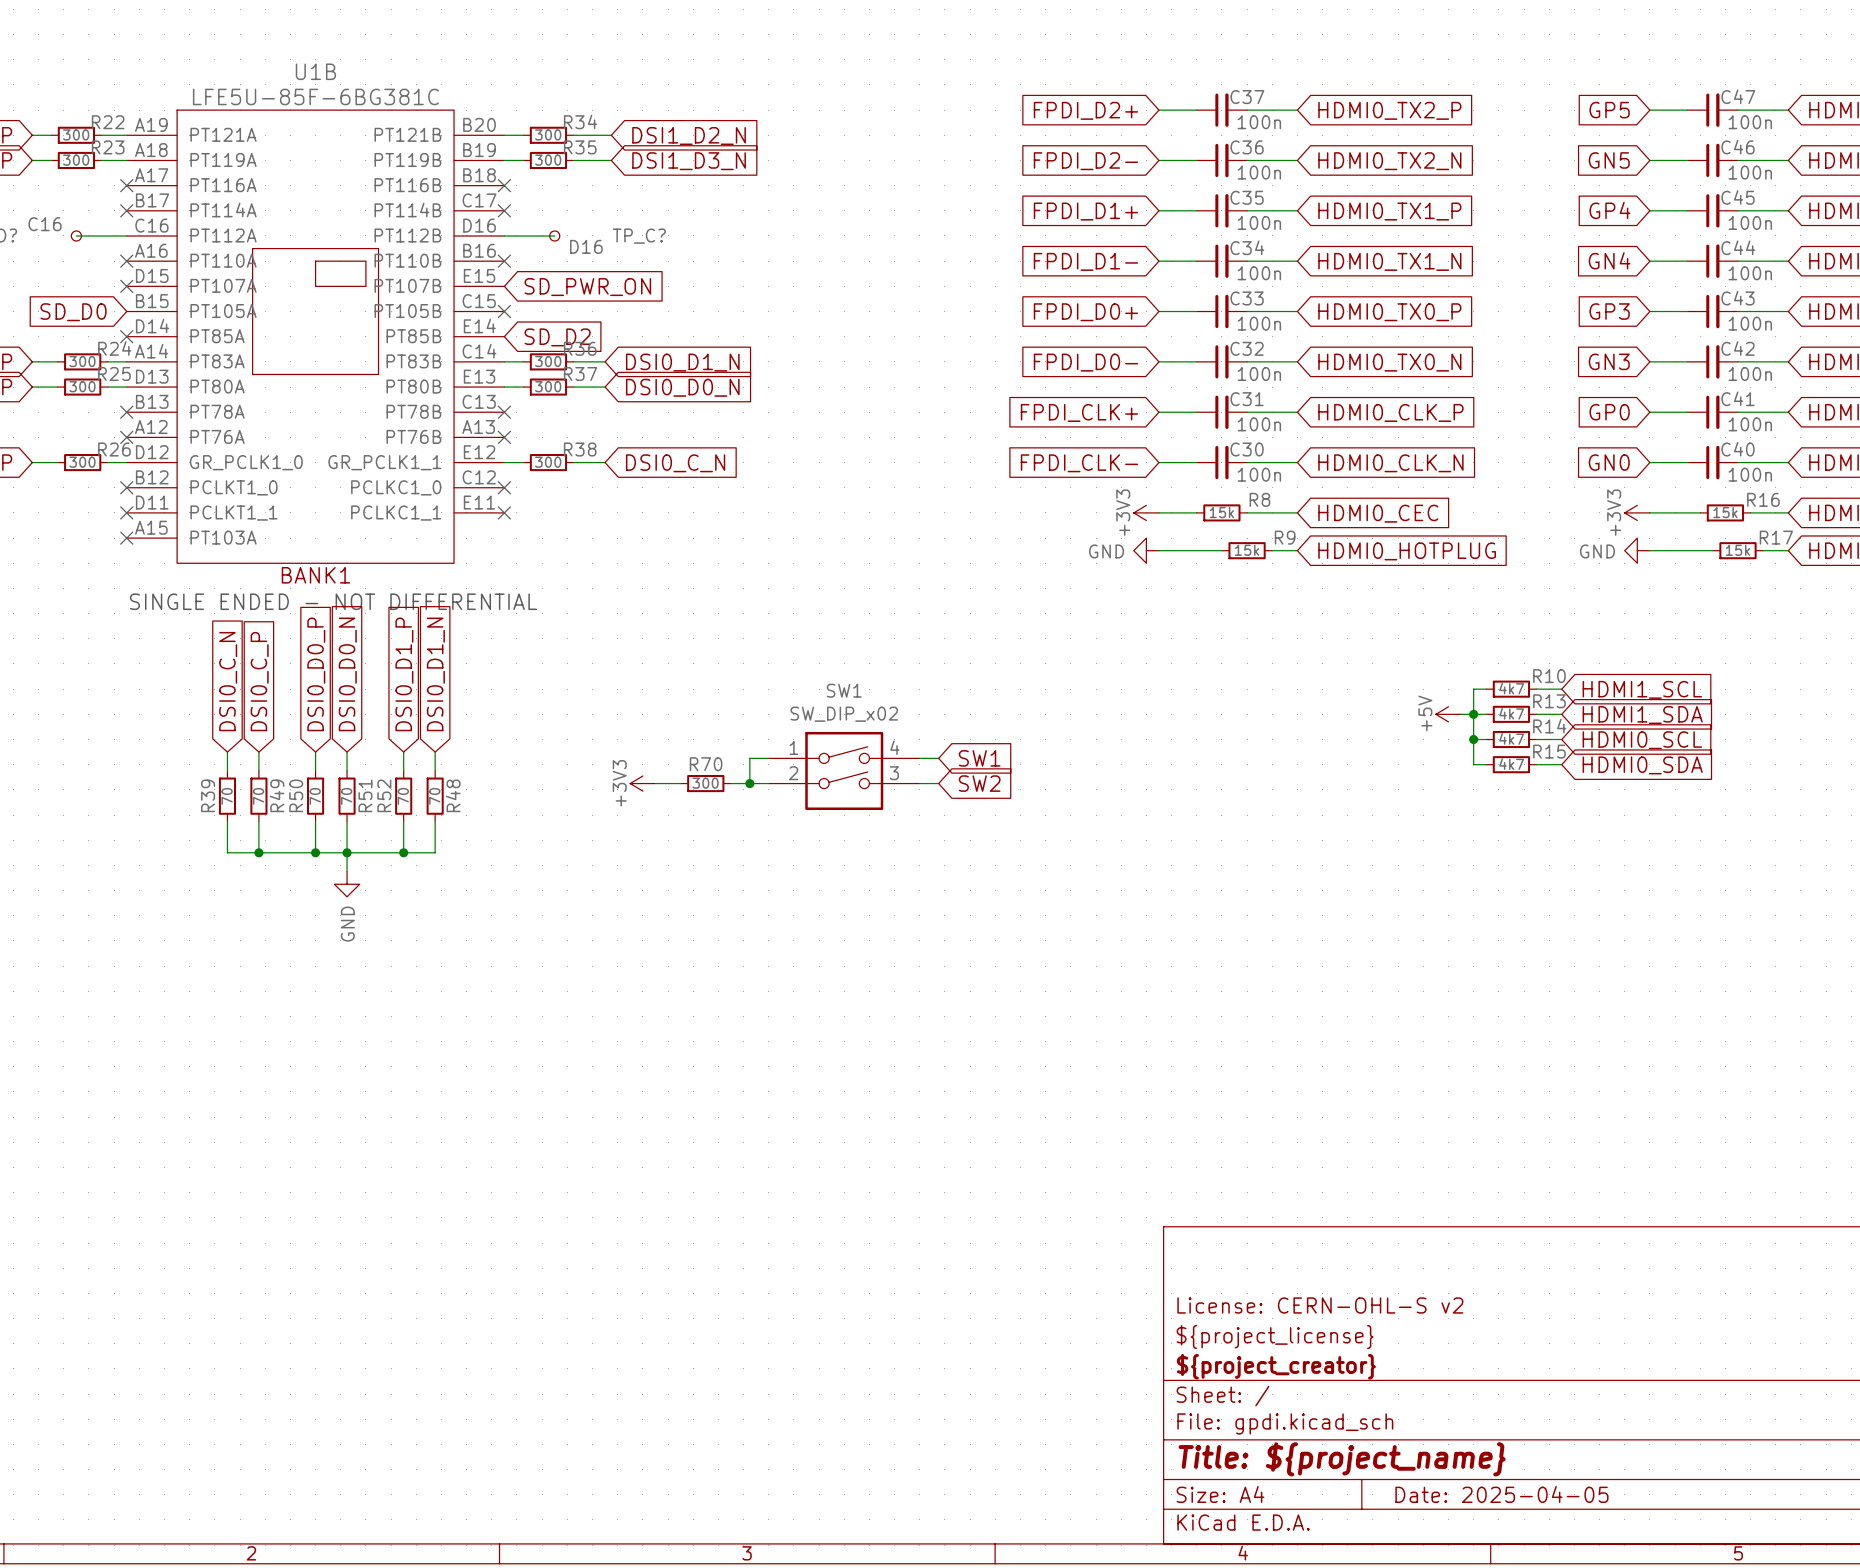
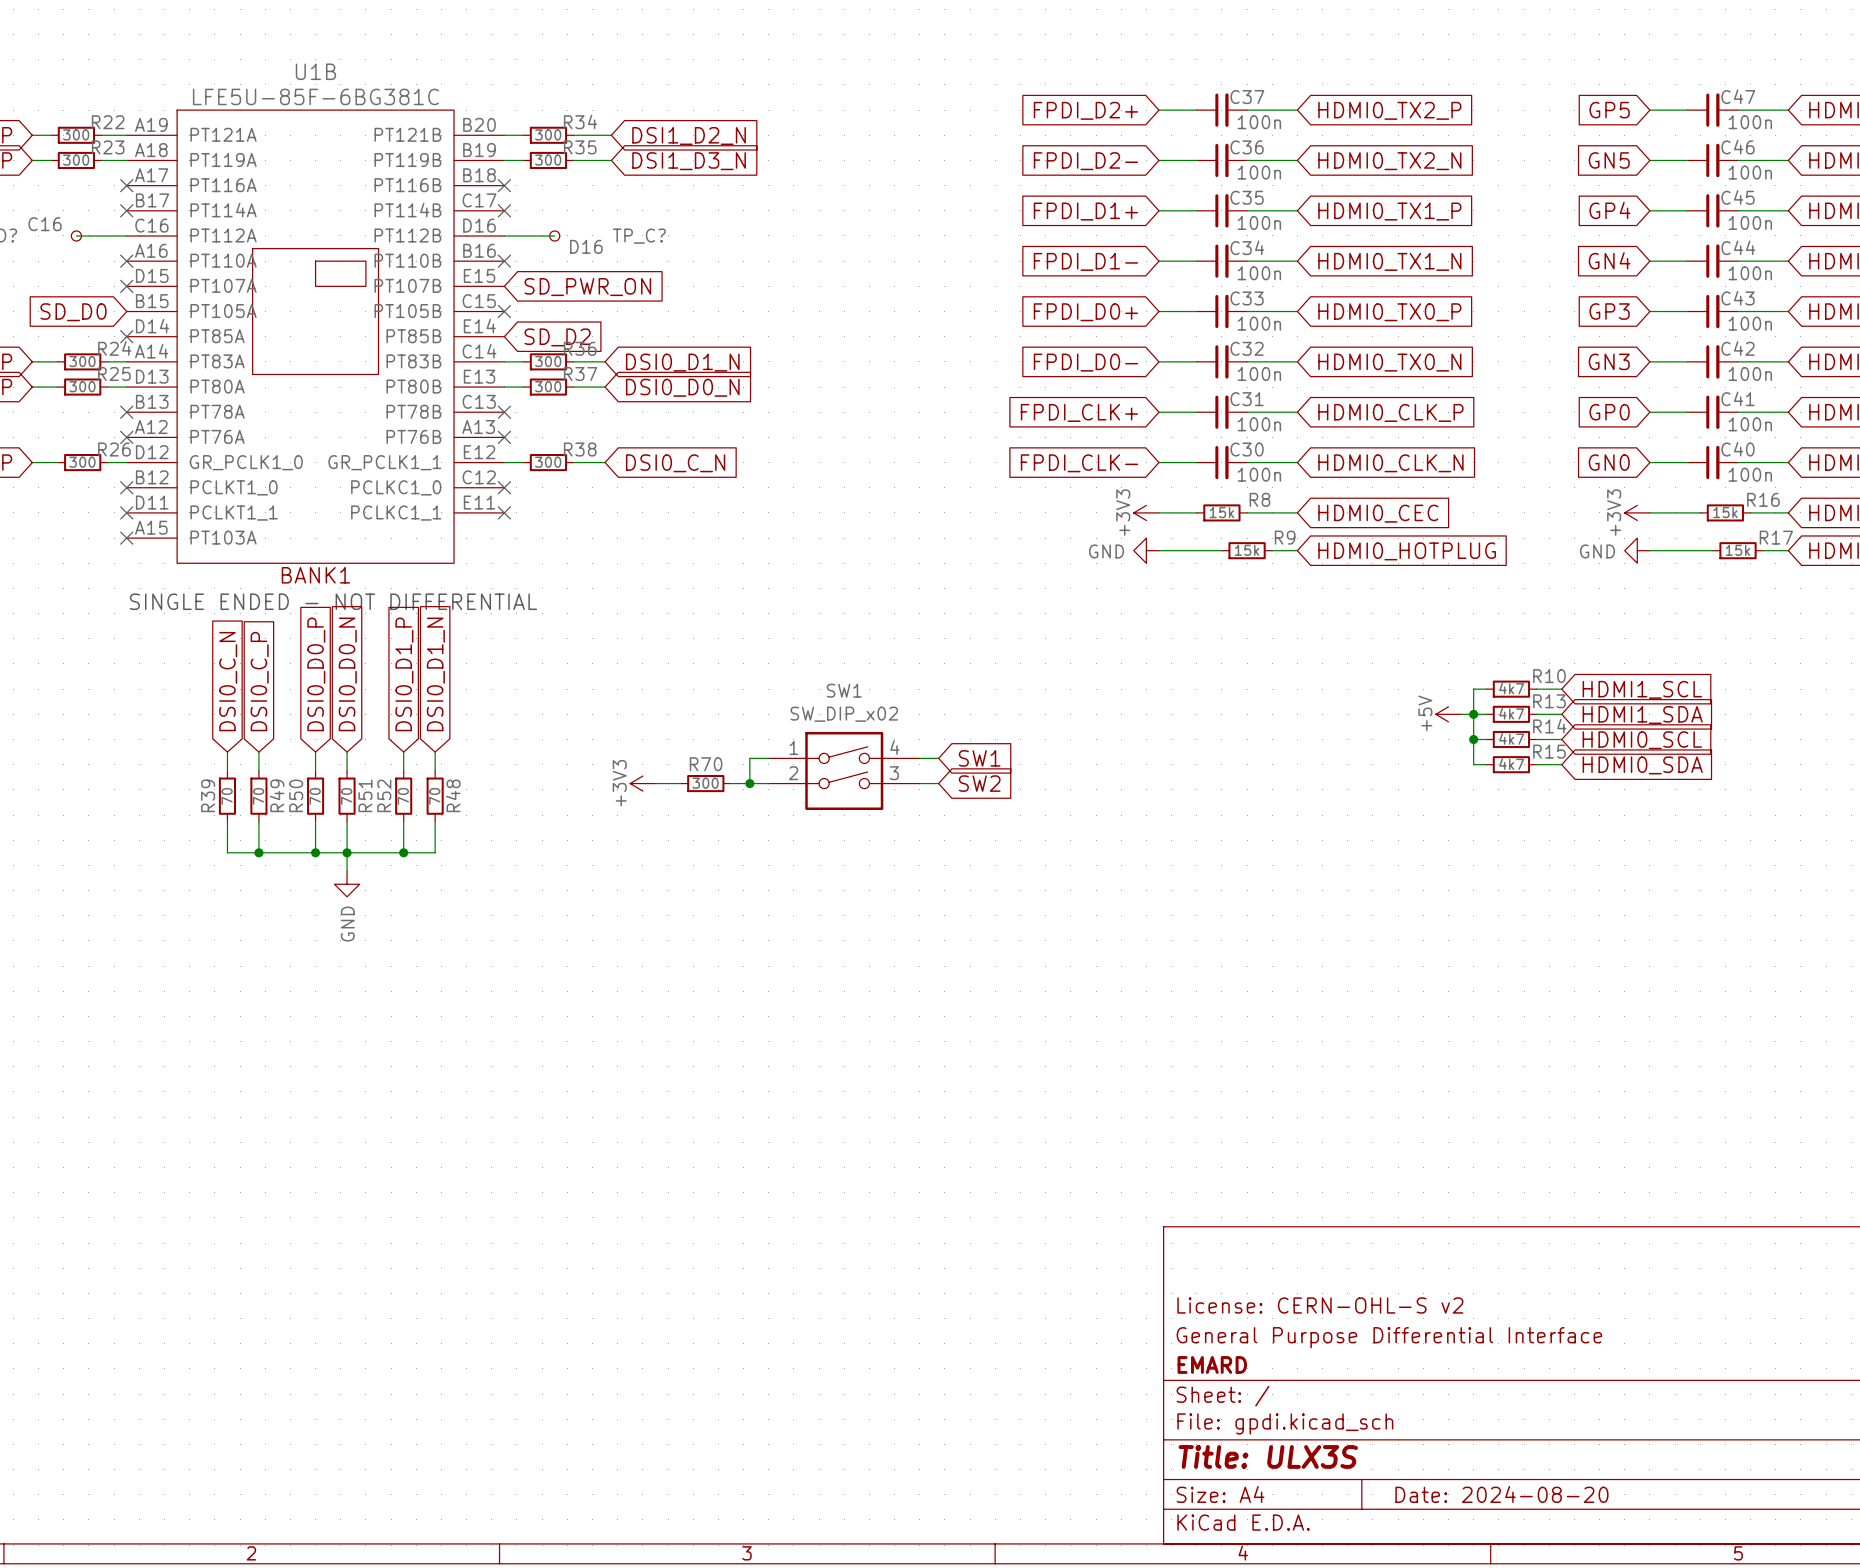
title block: ${project_license} (1275, 1337) -> General Purpose Differential Interface (1389, 1337)
title block: ${project_creator} (1276, 1366) -> EMARD (1212, 1364)
title block: Title: ${project_name} (1342, 1459) -> Title: ULX3S (1268, 1456)
title block: Date: 2025-04-05 (1501, 1494) -> Date: 2024-08-20 (1501, 1494)

